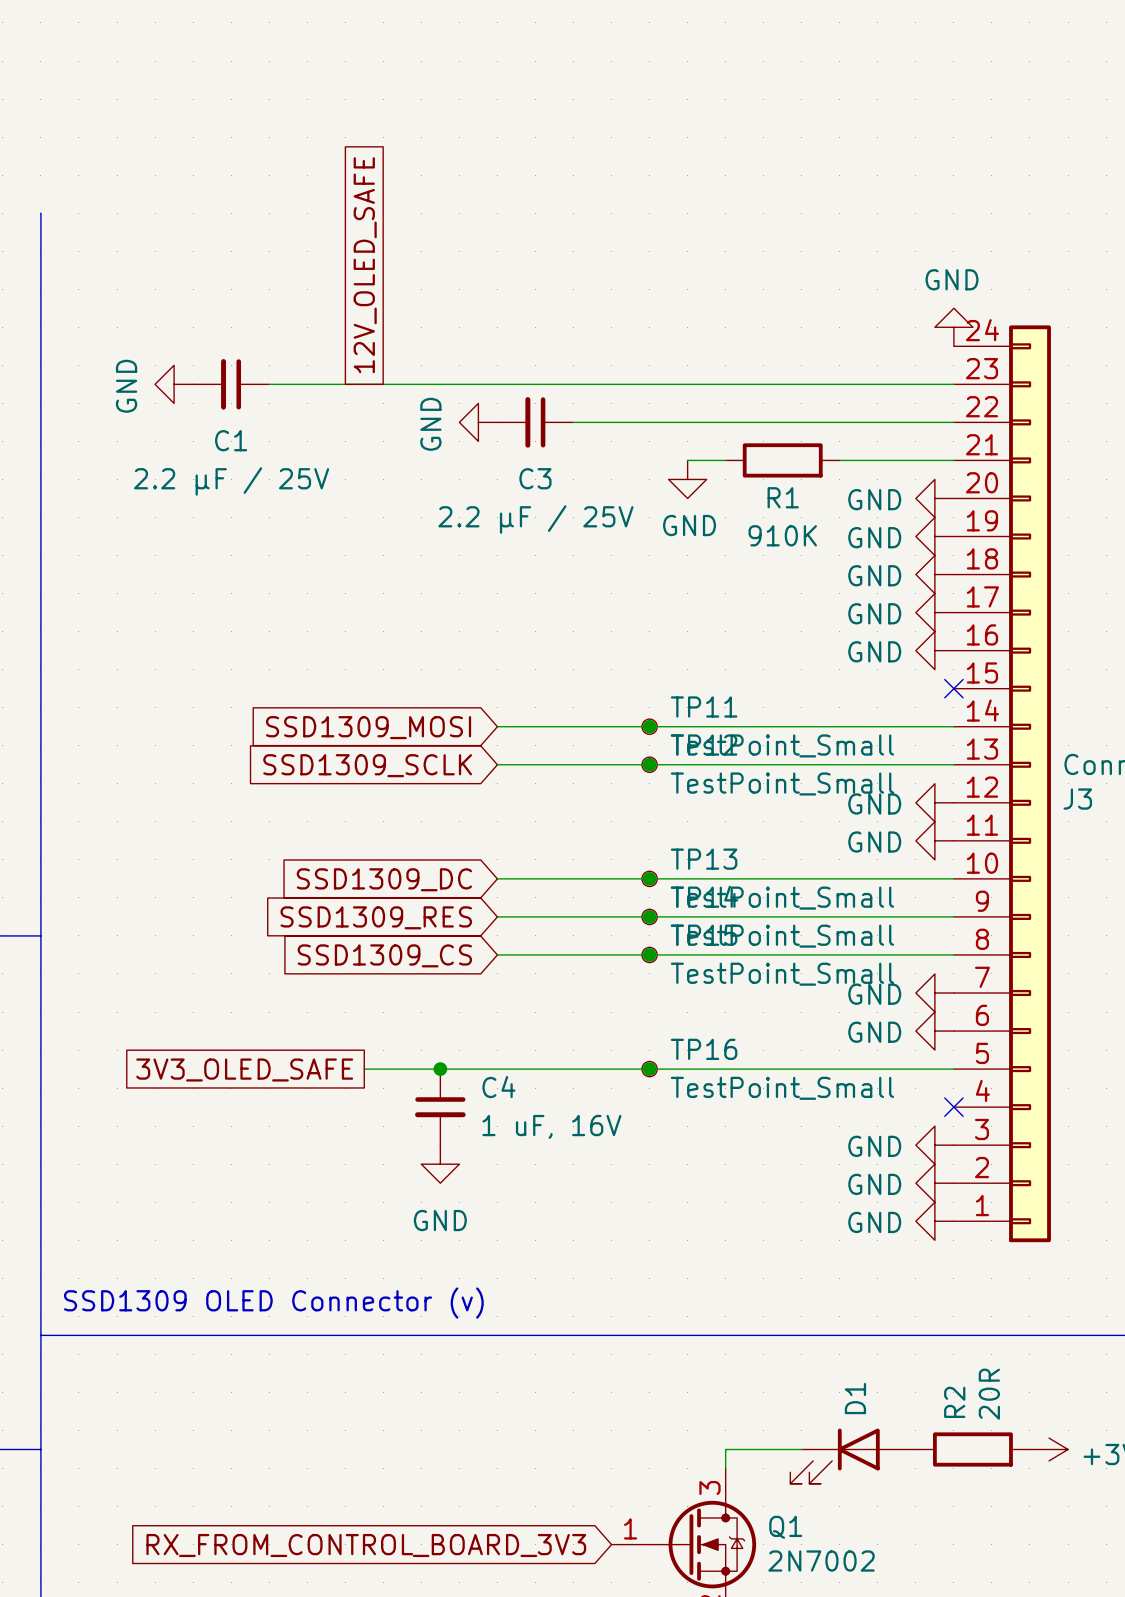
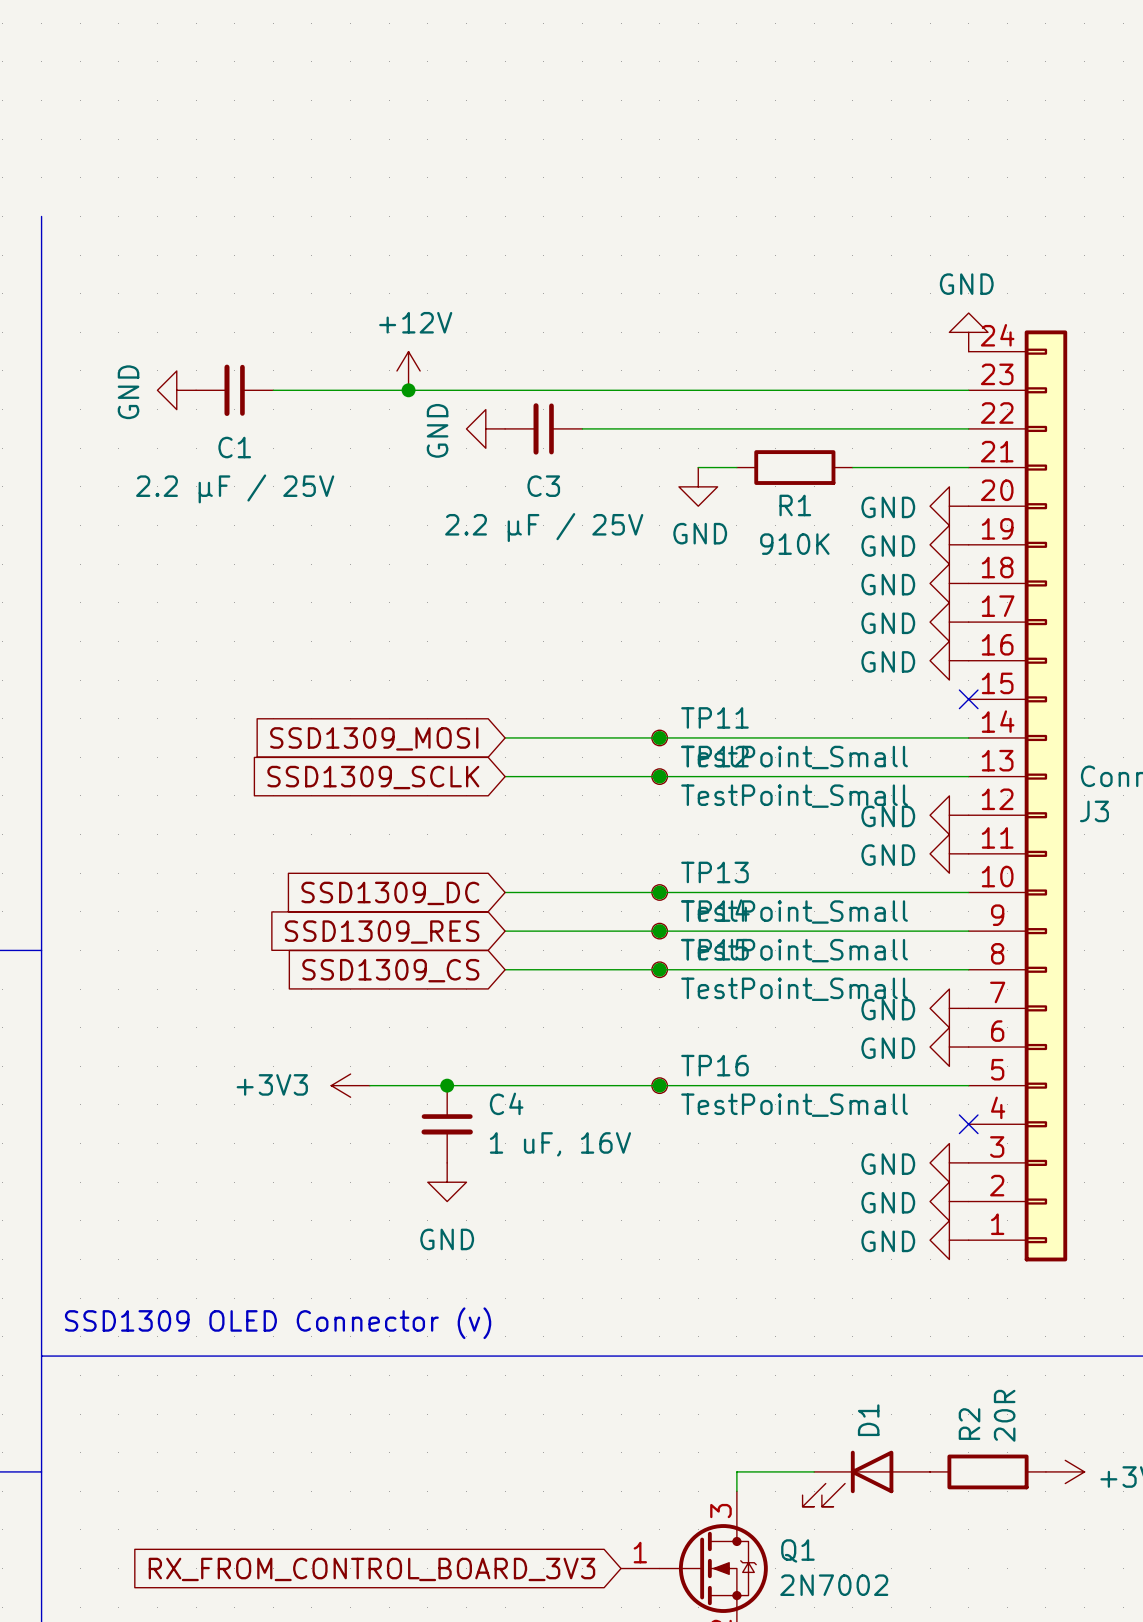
global label: 12V_OLED_SAFE (365, 265) -> none
power symbol: none -> +12V (408, 370)
junction: none -> (408, 390)
global label: 3V3_OLED_SAFE (244, 1069) -> none
power symbol: none -> +3V3 (350, 1085)

